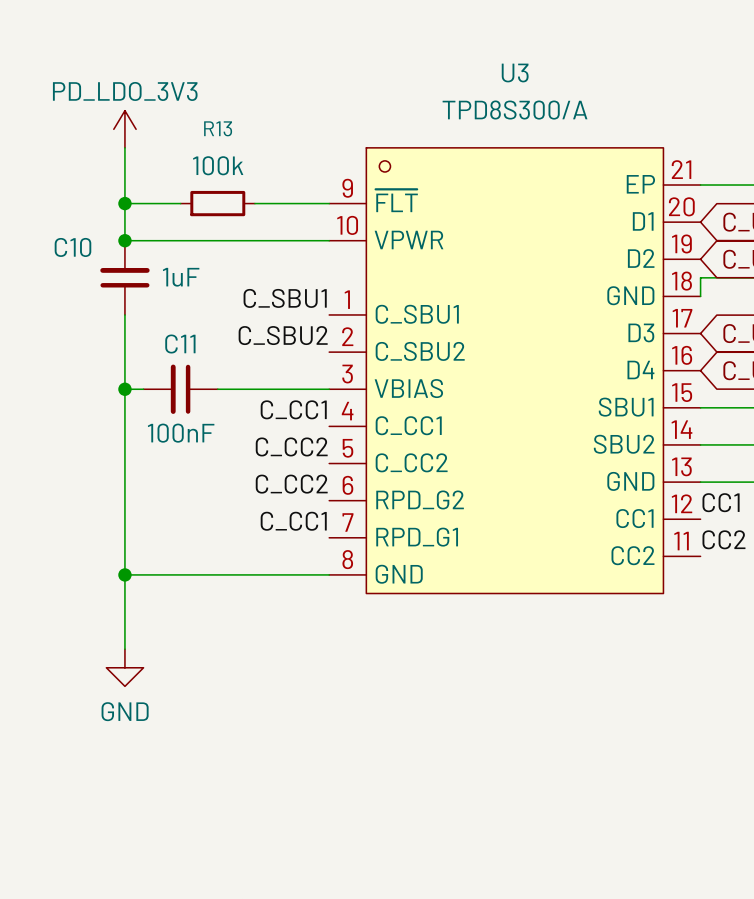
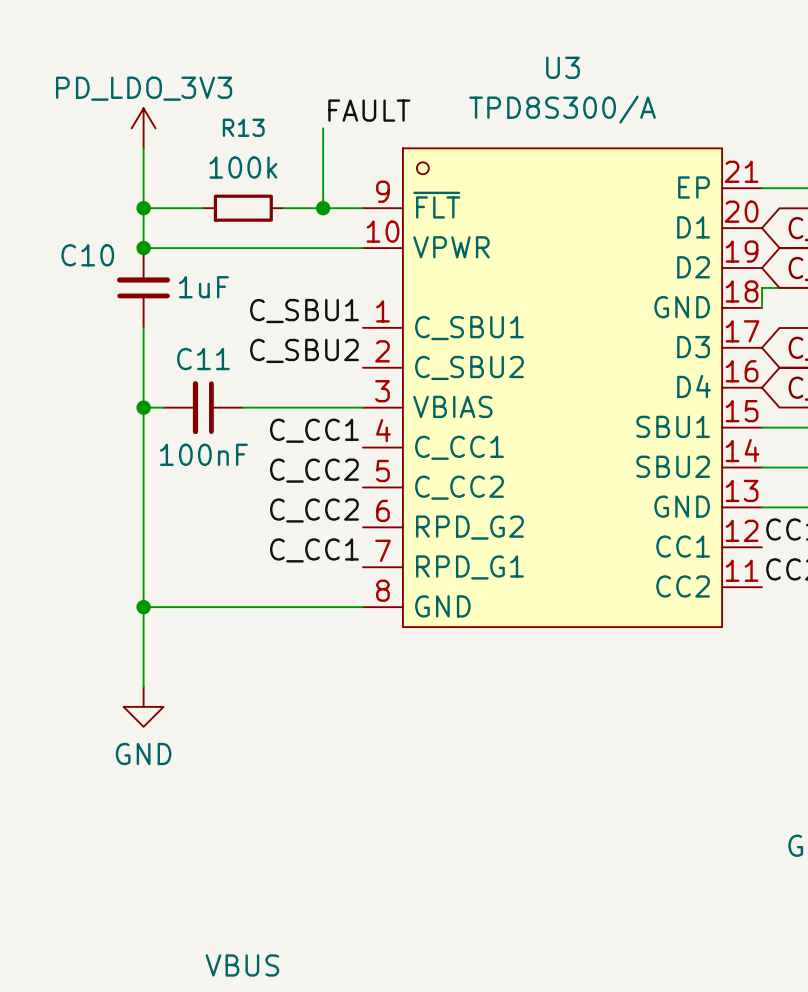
label: none -> FAULT (369, 110)
wire: none -> (323, 128) (323, 208)
junction: none -> (323, 208)

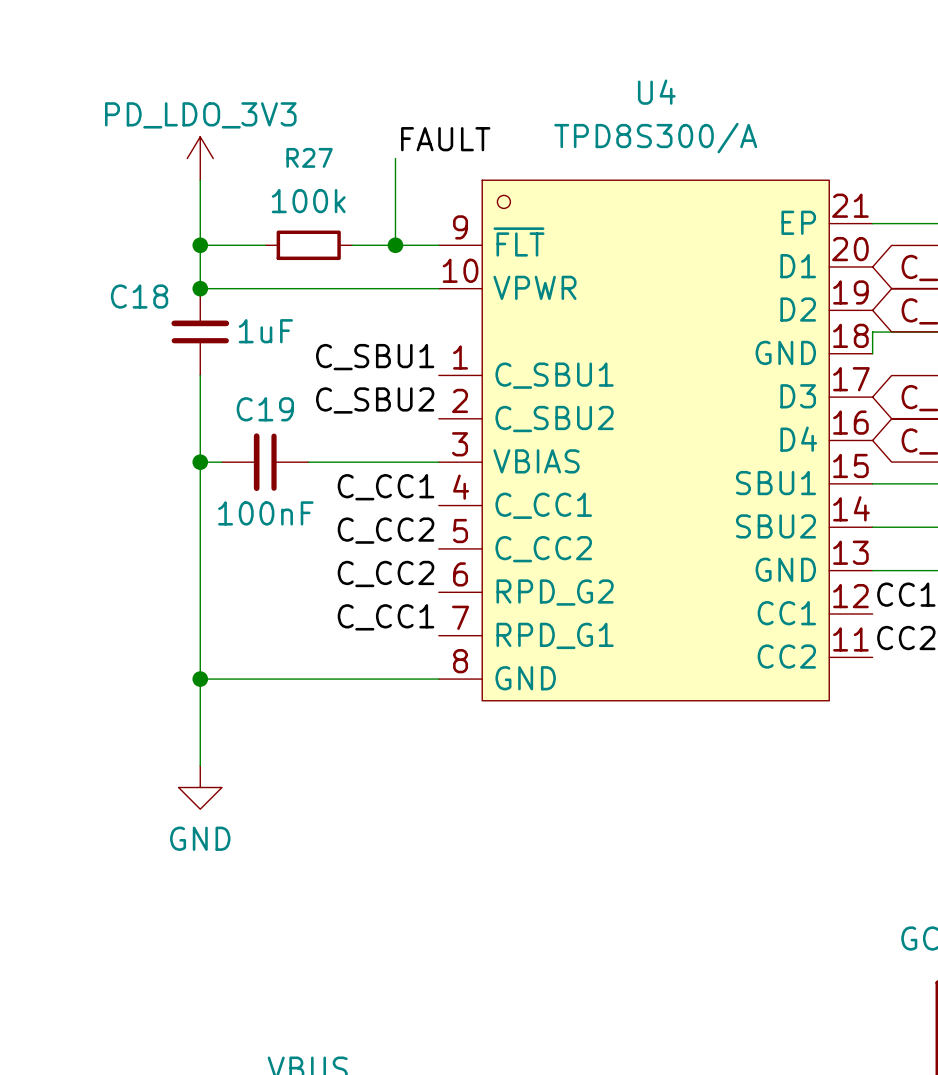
U3 name: U3 (562, 67) -> U4 (656, 92)
R13 name: R13 (243, 127) -> R27 (309, 157)
C10 name: C10 (87, 255) -> C18 (139, 296)
C11 name: C11 (203, 359) -> C19 (265, 409)

